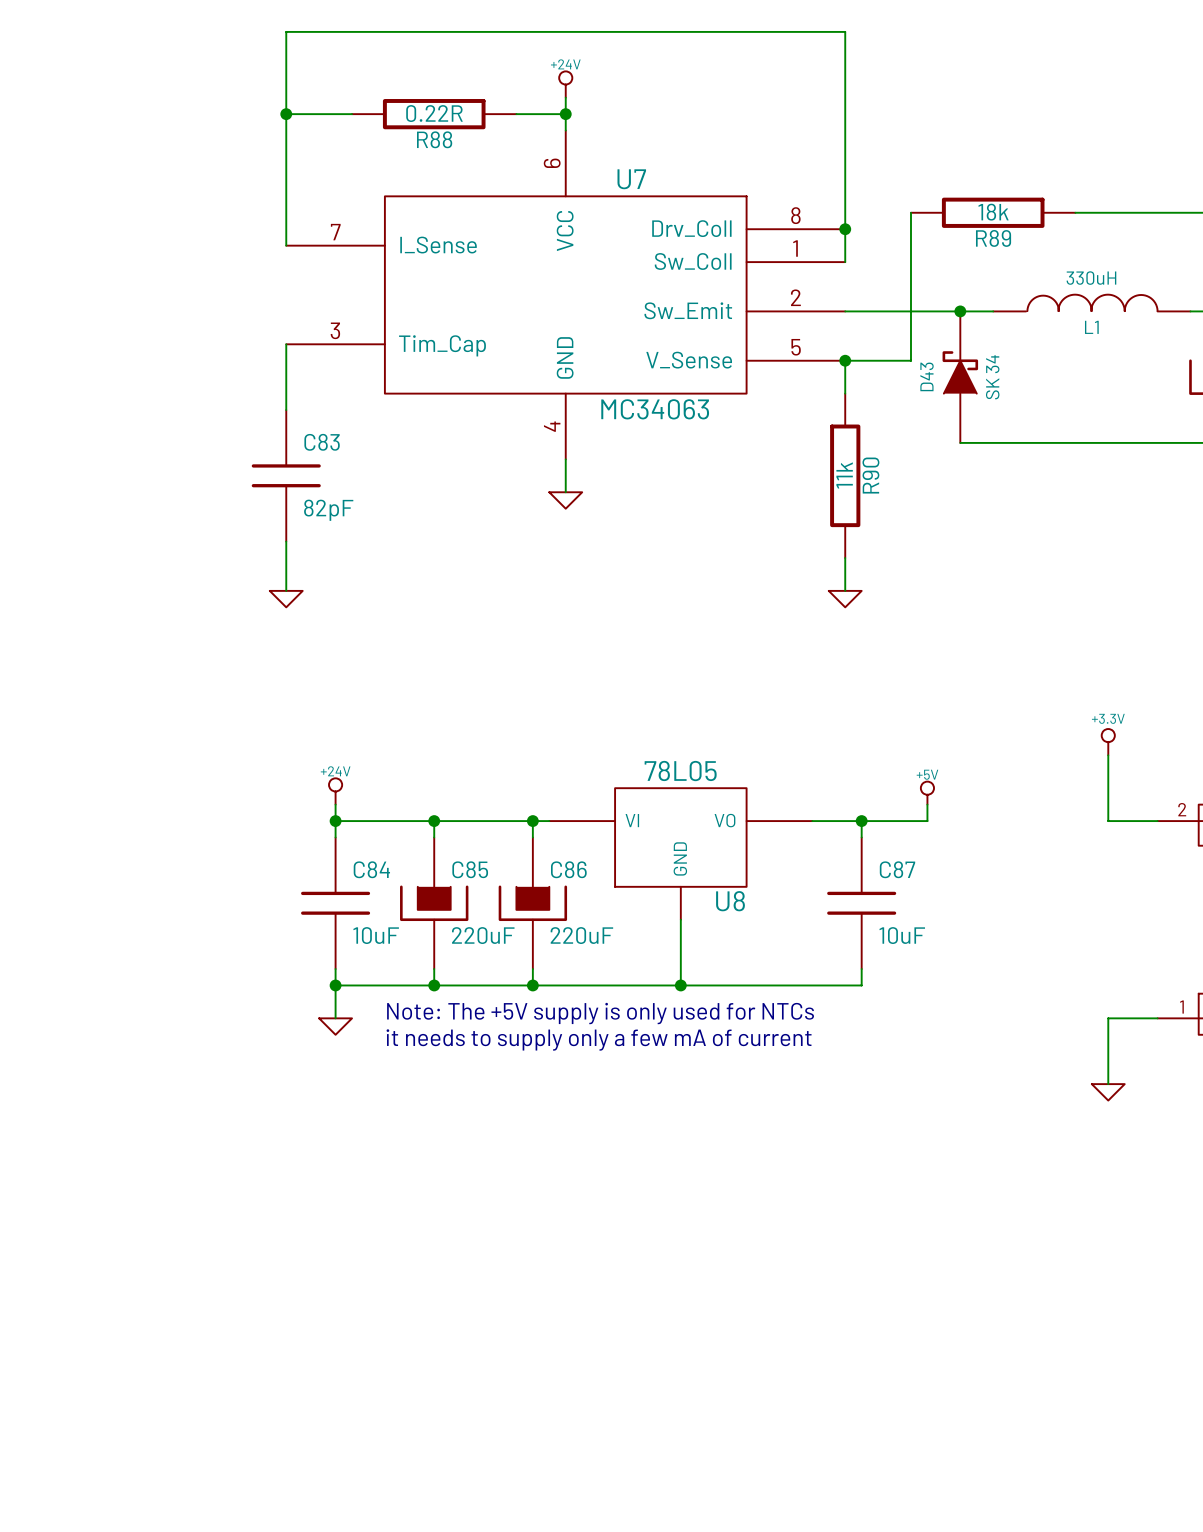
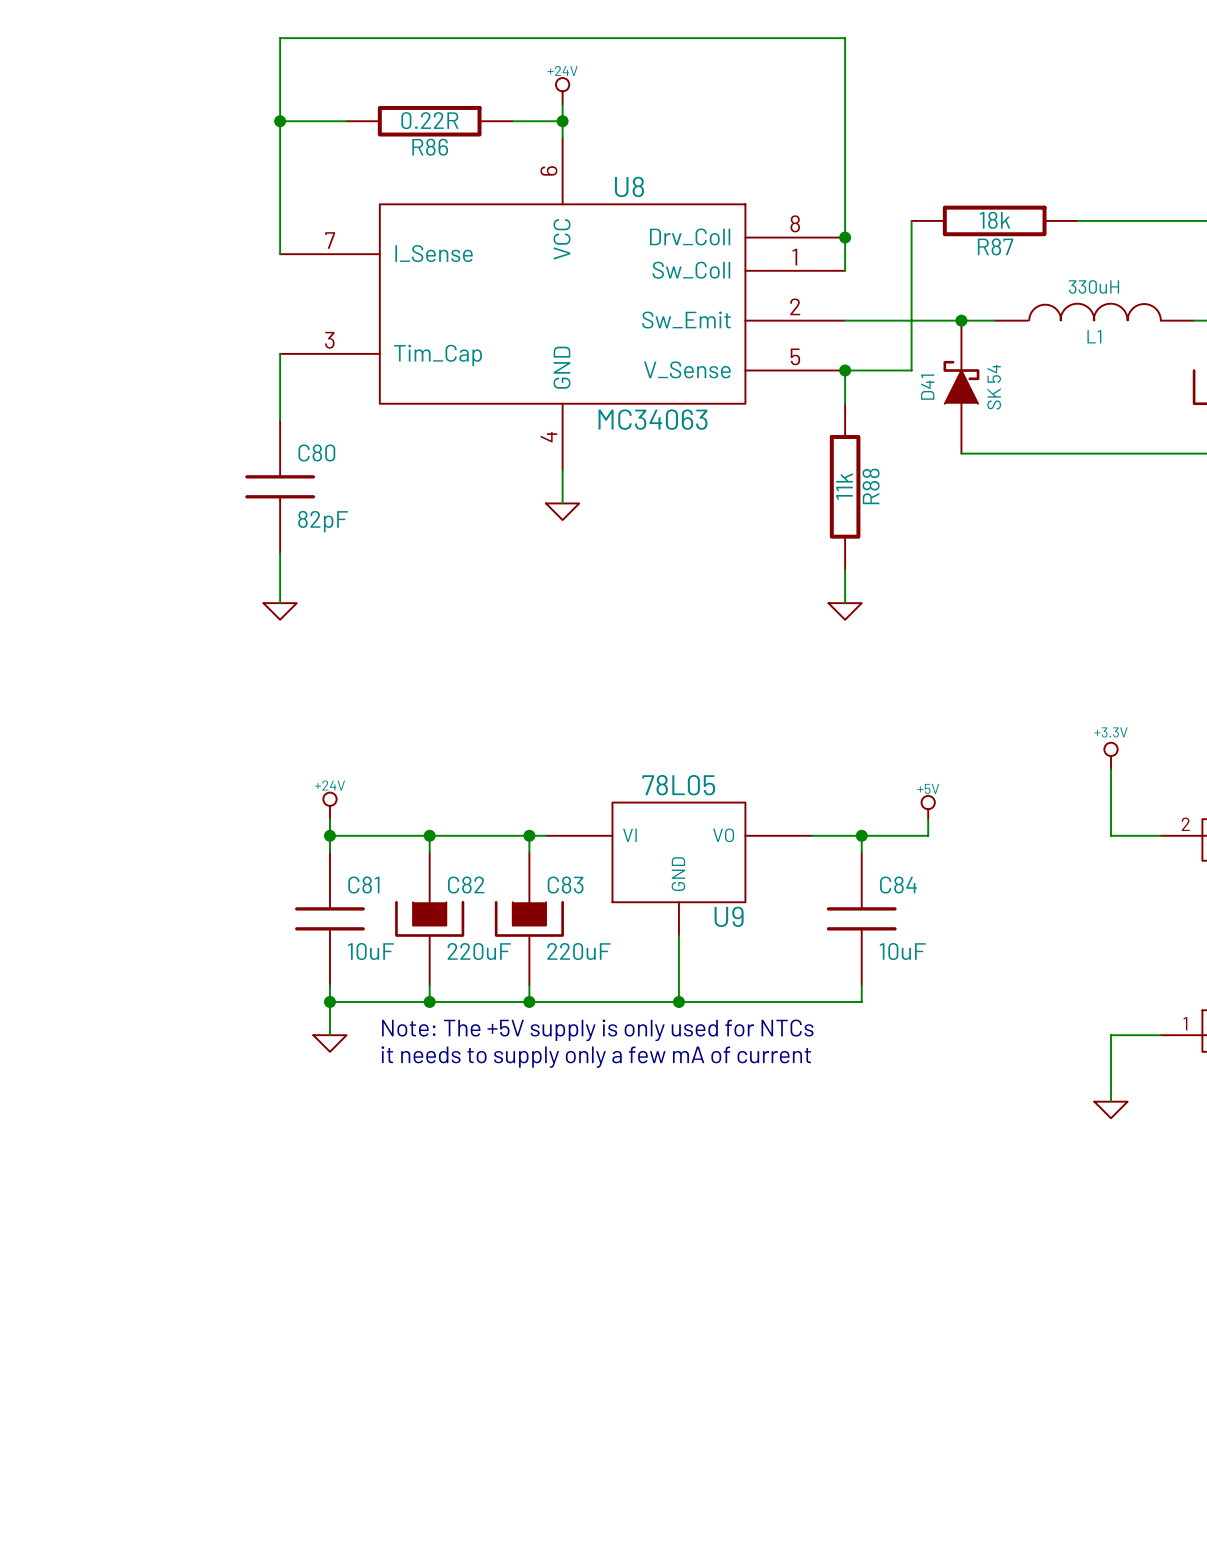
R88 name: R88 (434, 139) -> R86 (430, 147)
U7 name: U7 (631, 179) -> U8 (629, 186)
R89 name: R89 (993, 238) -> R87 (995, 246)
D43 name: D43 (927, 376) -> D41 (927, 387)
D43 value: SK 34 (992, 377) -> SK 54 (994, 387)
C83 name: C83 (322, 442) -> C80 (316, 452)
R90 name: R90 (870, 475) -> R88 (871, 486)
C84 name: C84 (371, 869) -> C81 (363, 885)
C85 name: C85 (470, 869) -> C82 (466, 885)
C86 name: C86 (568, 869) -> C83 (565, 885)
C87 name: C87 (897, 869) -> C84 (898, 885)
U8 name: U8 (730, 901) -> U9 (729, 916)

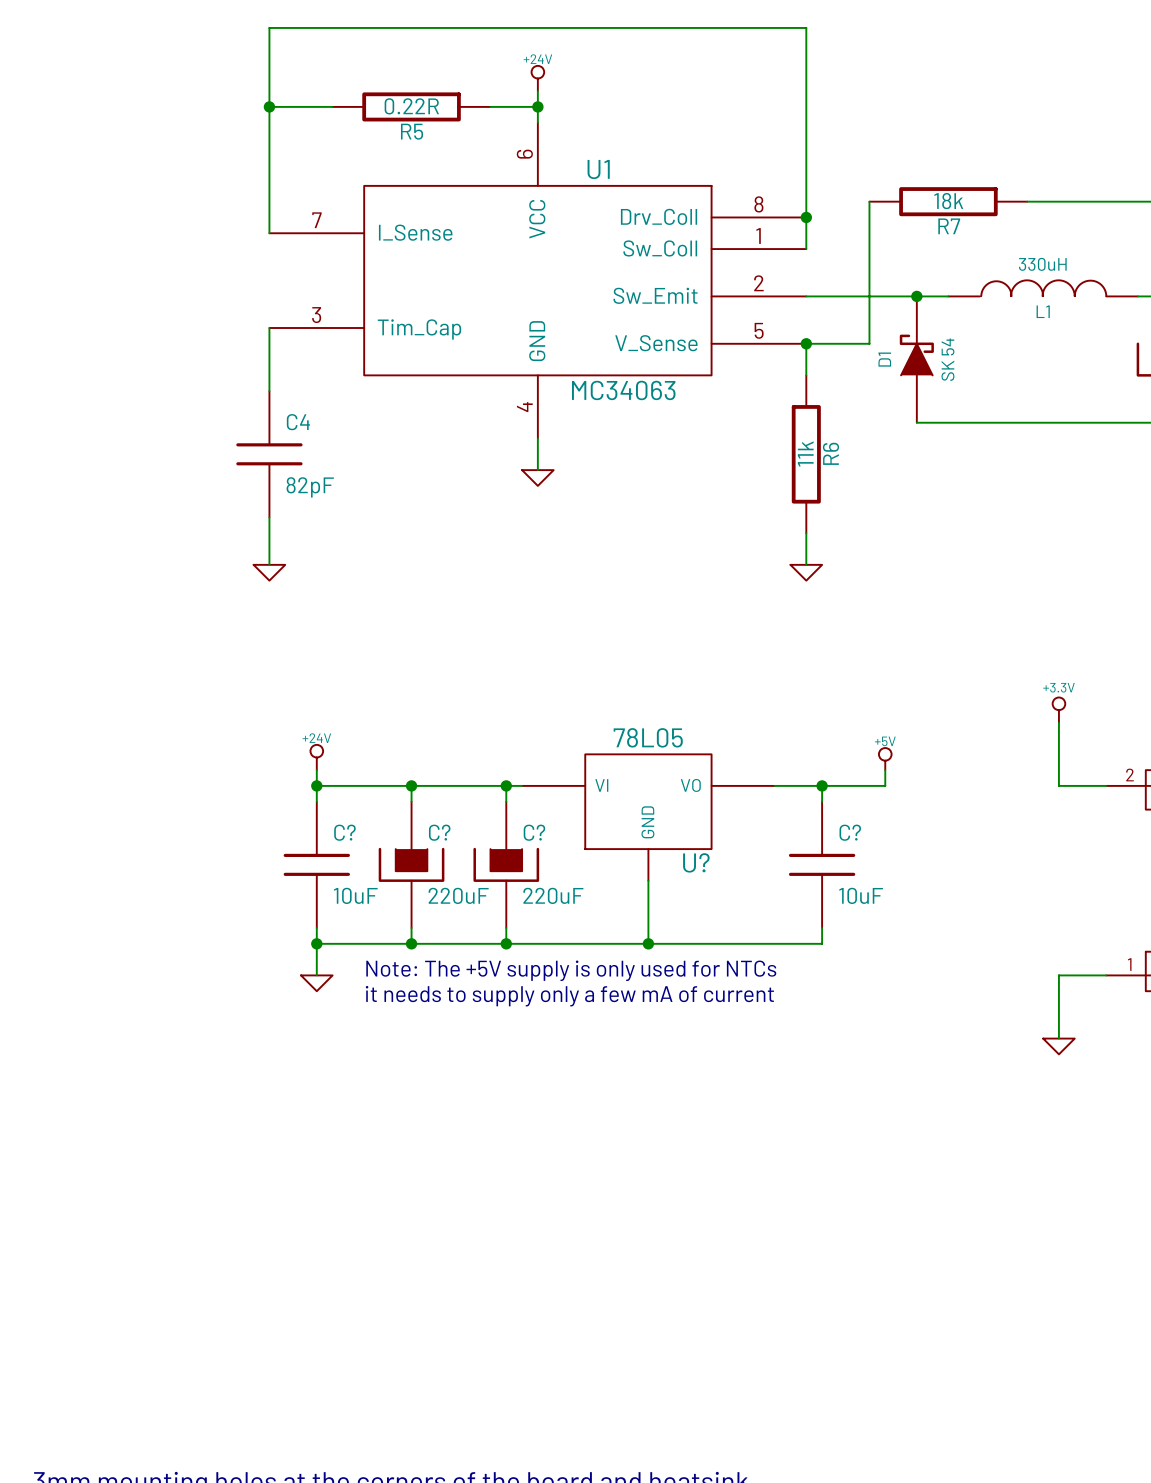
R86 name: R86 (430, 147) -> R5 (412, 131)
U8 name: U8 (629, 186) -> U1 (598, 169)
R87 name: R87 (995, 246) -> R7 (949, 226)
D41 name: D41 (927, 387) -> D1 (884, 359)
C80 name: C80 (316, 452) -> C4 (298, 422)
R88 name: R88 (871, 486) -> R6 (830, 453)
C81 name: C81 (363, 885) -> C? (344, 832)
C82 name: C82 (466, 885) -> C? (439, 832)
C83 name: C83 (565, 885) -> C? (534, 832)
C84 name: C84 (898, 885) -> C? (850, 832)
U9 name: U9 (729, 916) -> U? (696, 862)

